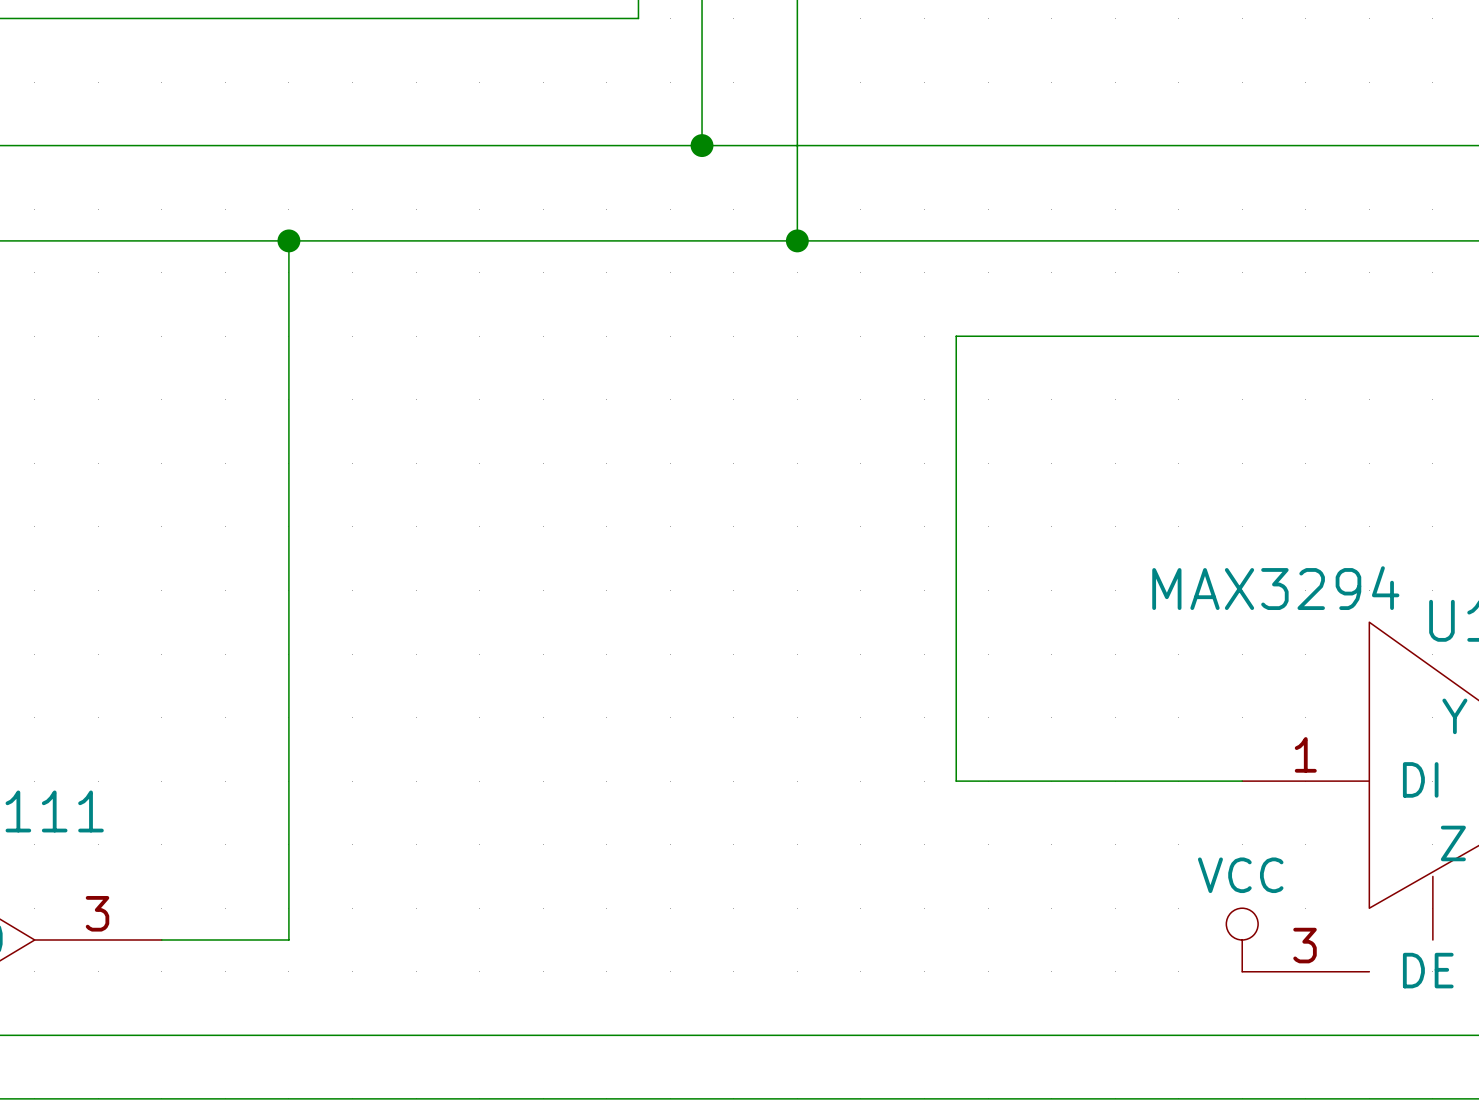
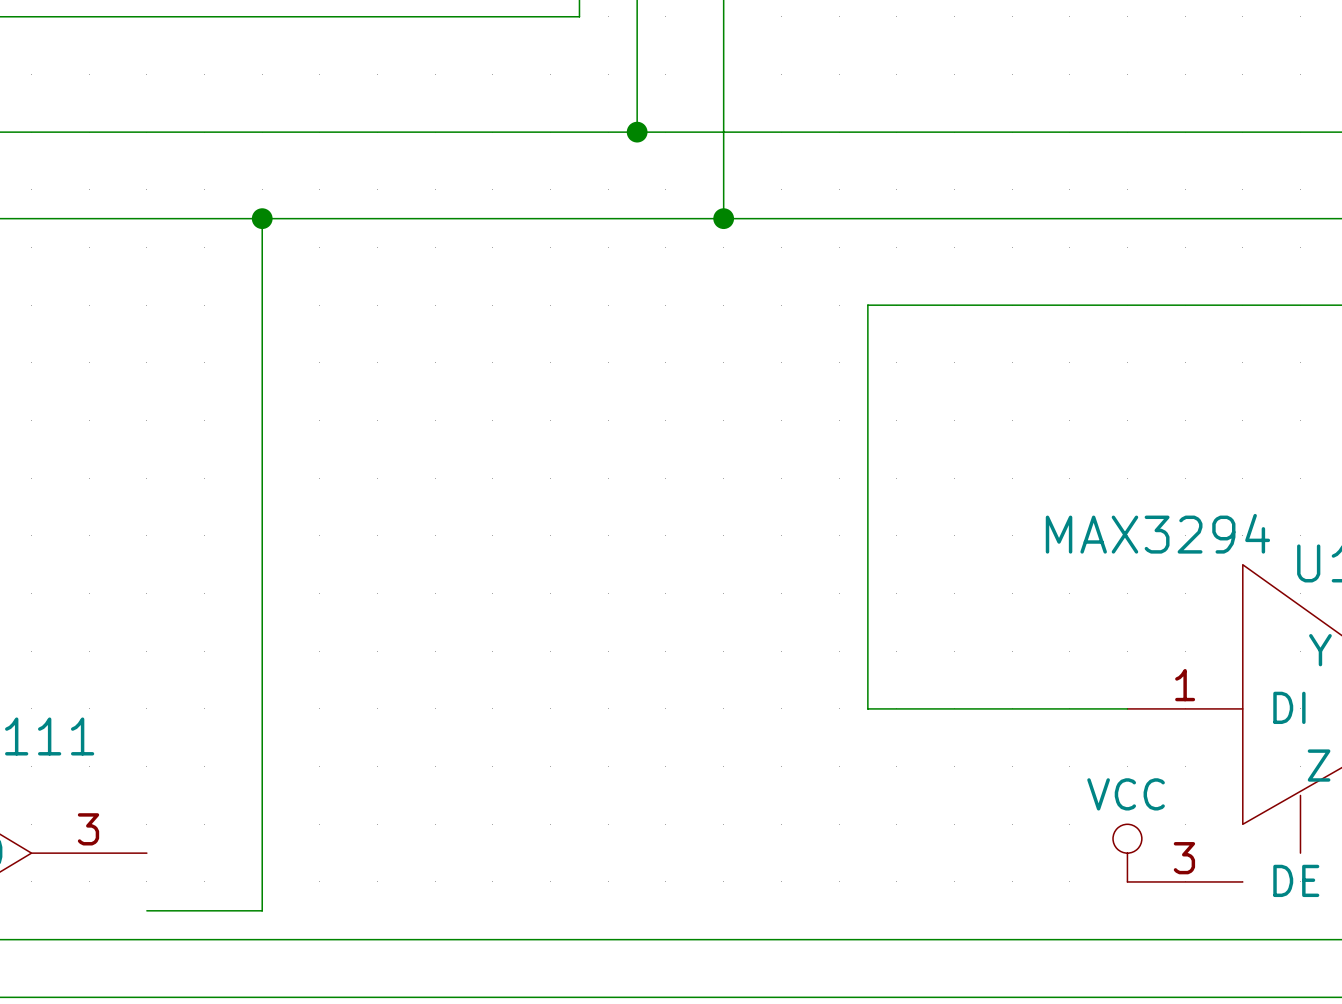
wire: (161, 939) (288, 939) -> (146, 910) (262, 910) (262, 853)

